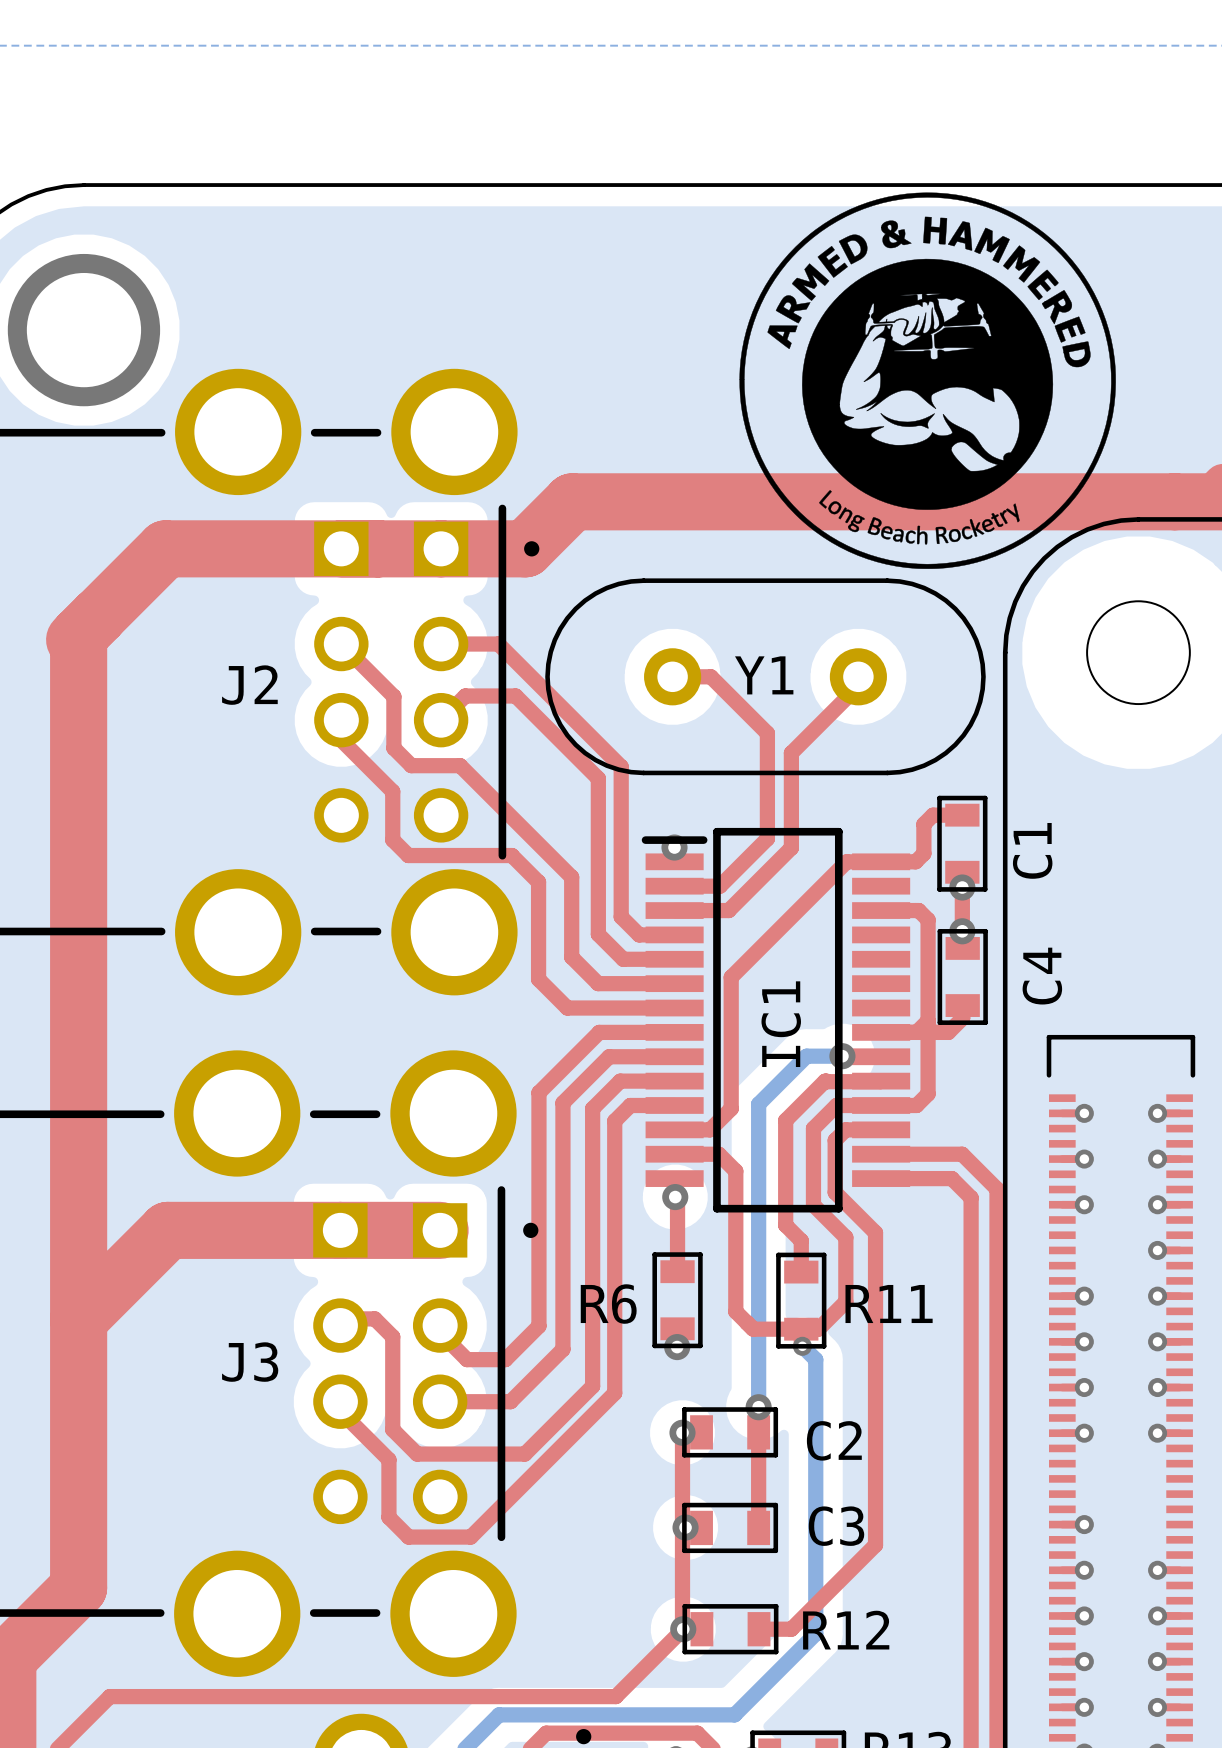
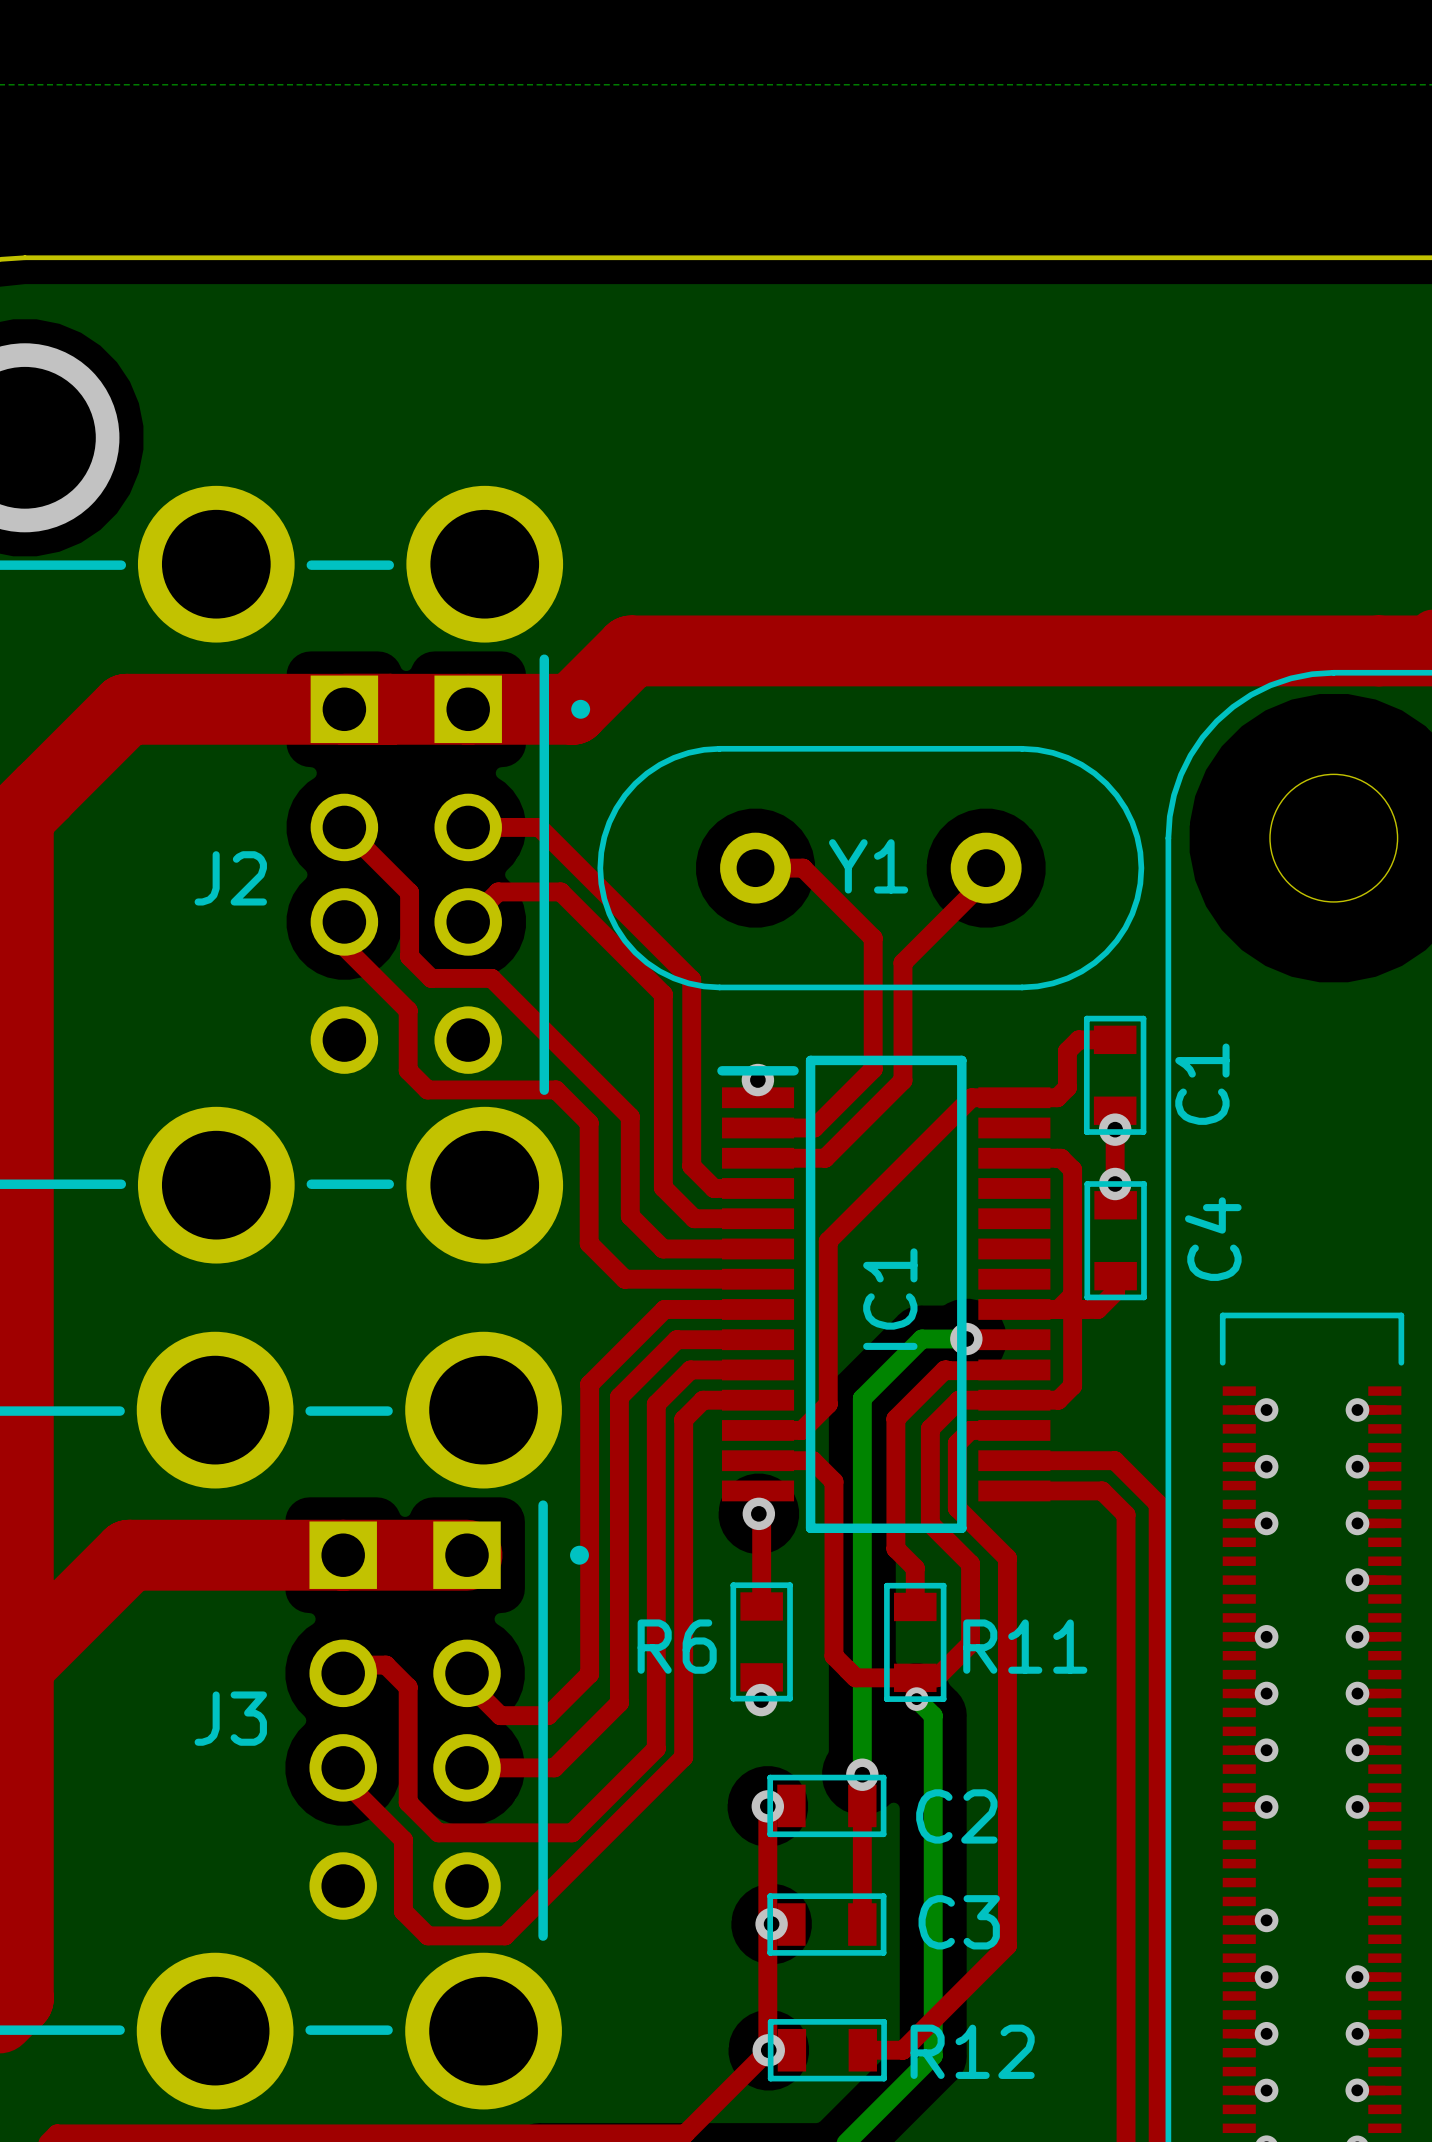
drawing: [739, 192, 1116, 569] -> none

